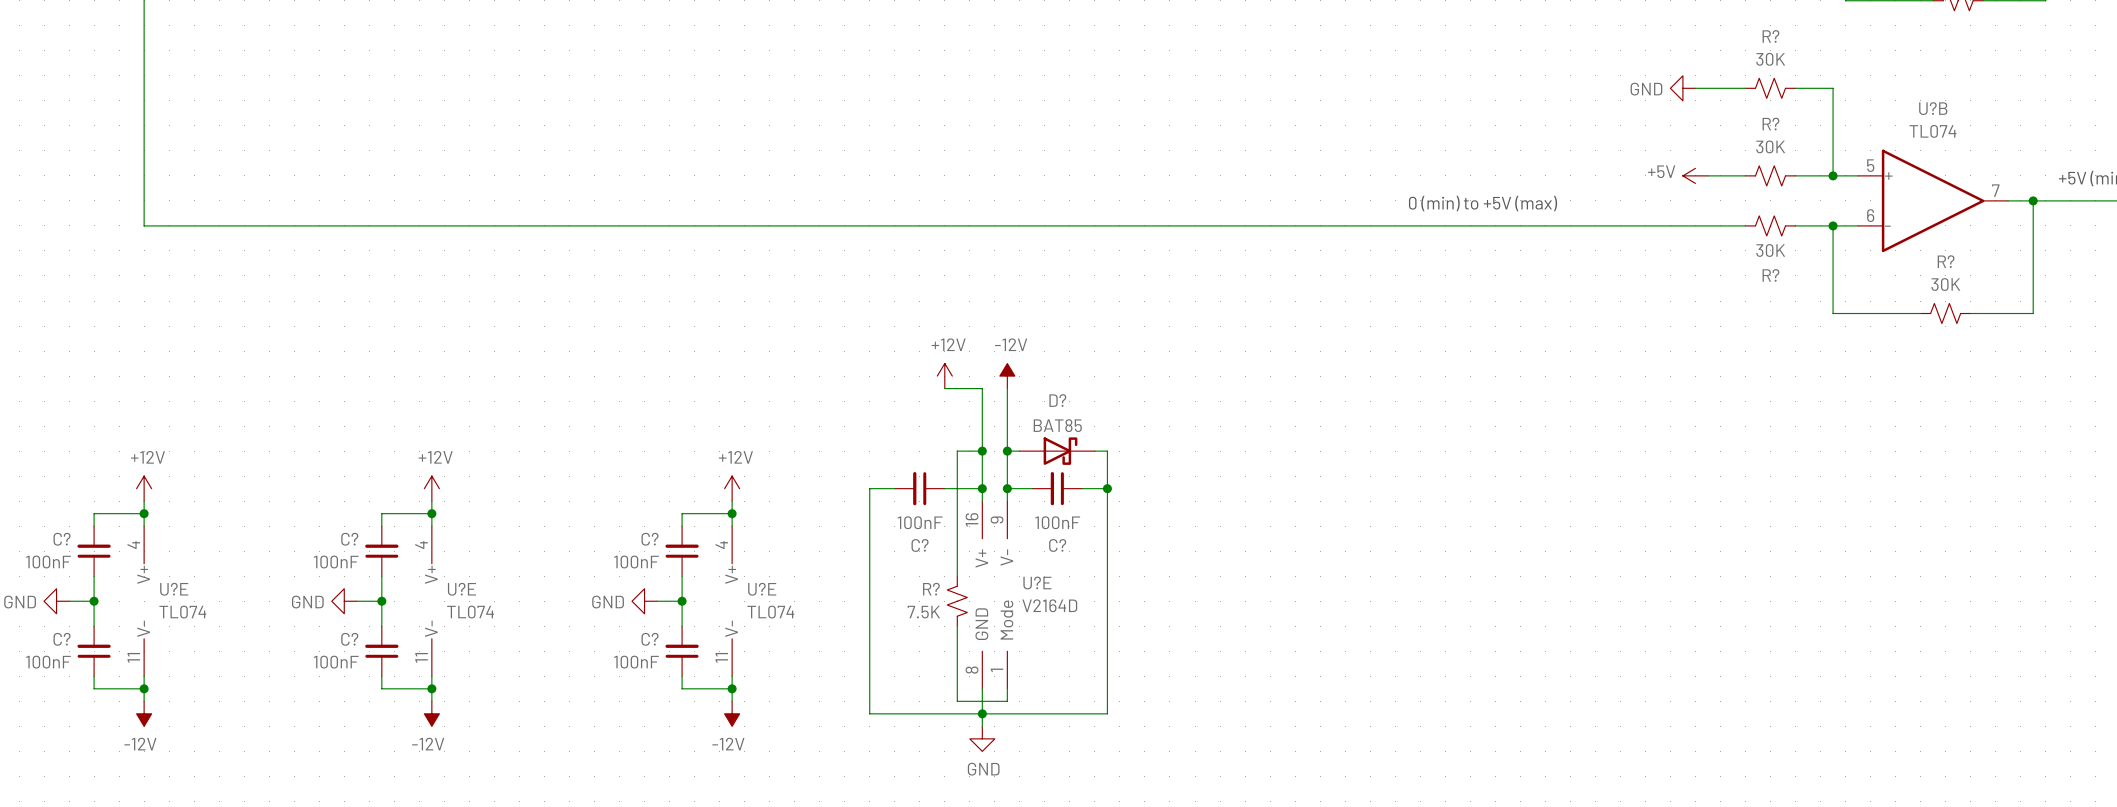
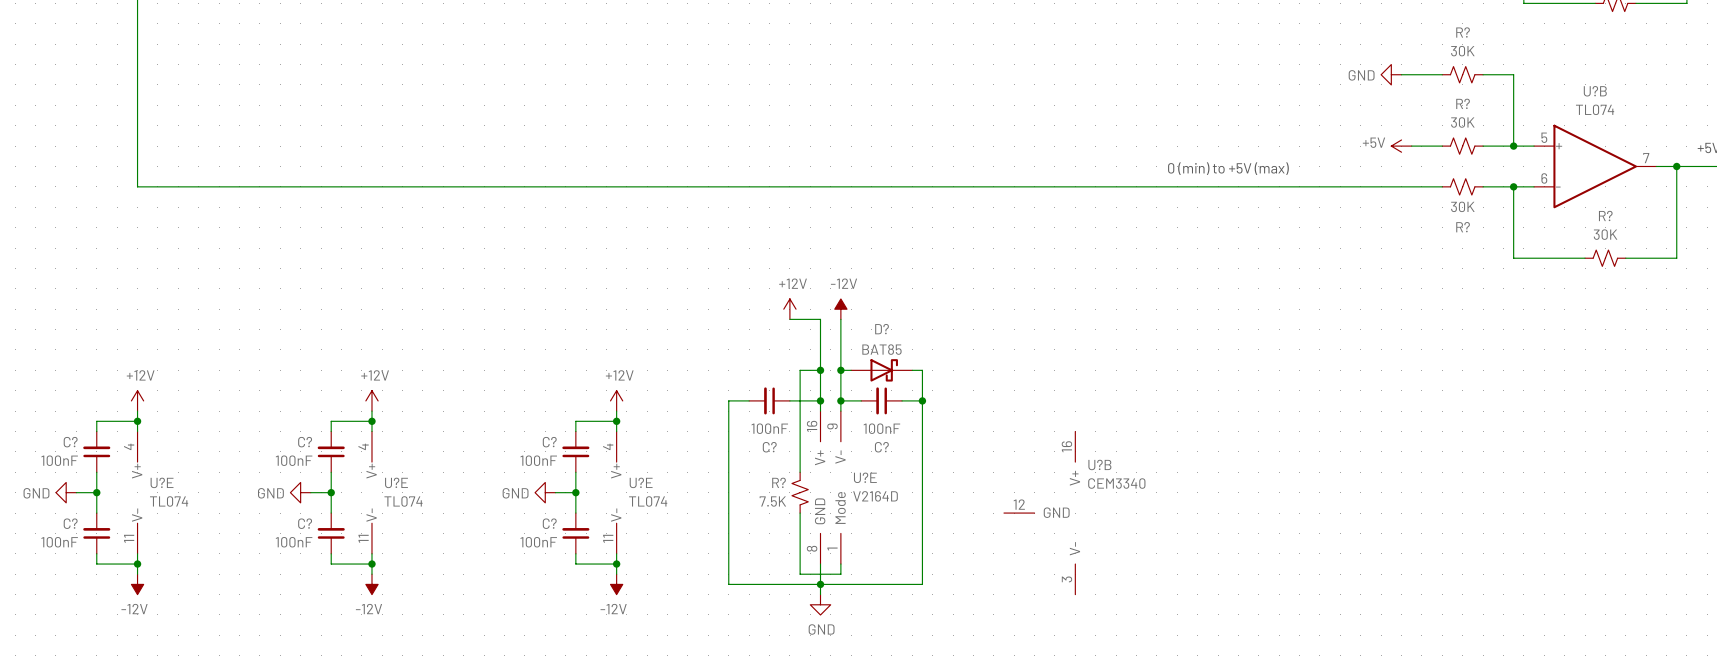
U?B: none -> CEM3340 (1039, 513)

